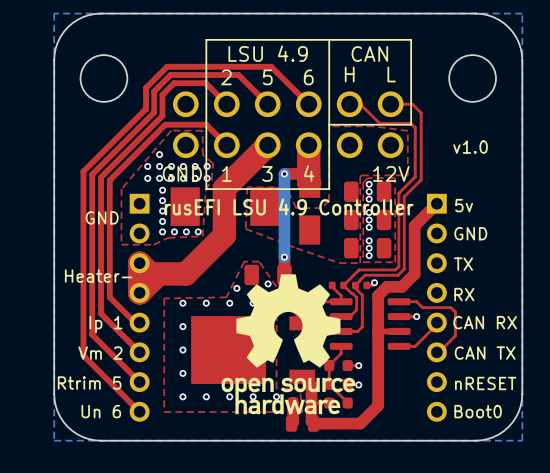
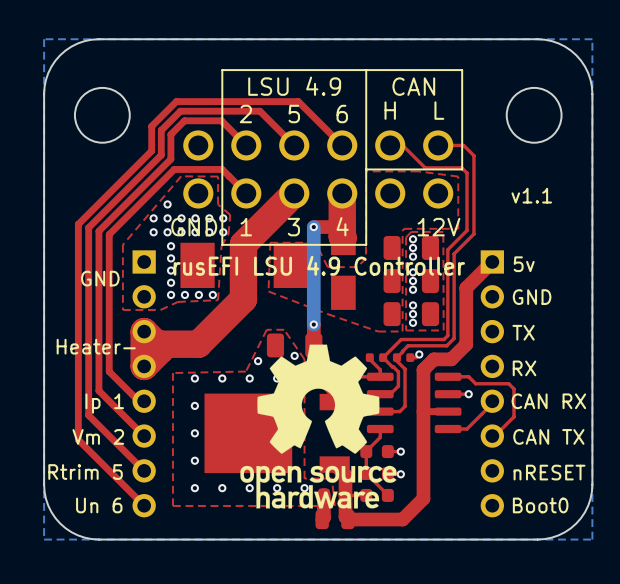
text: v1.0 (470, 147) -> v1.1 (531, 195)

